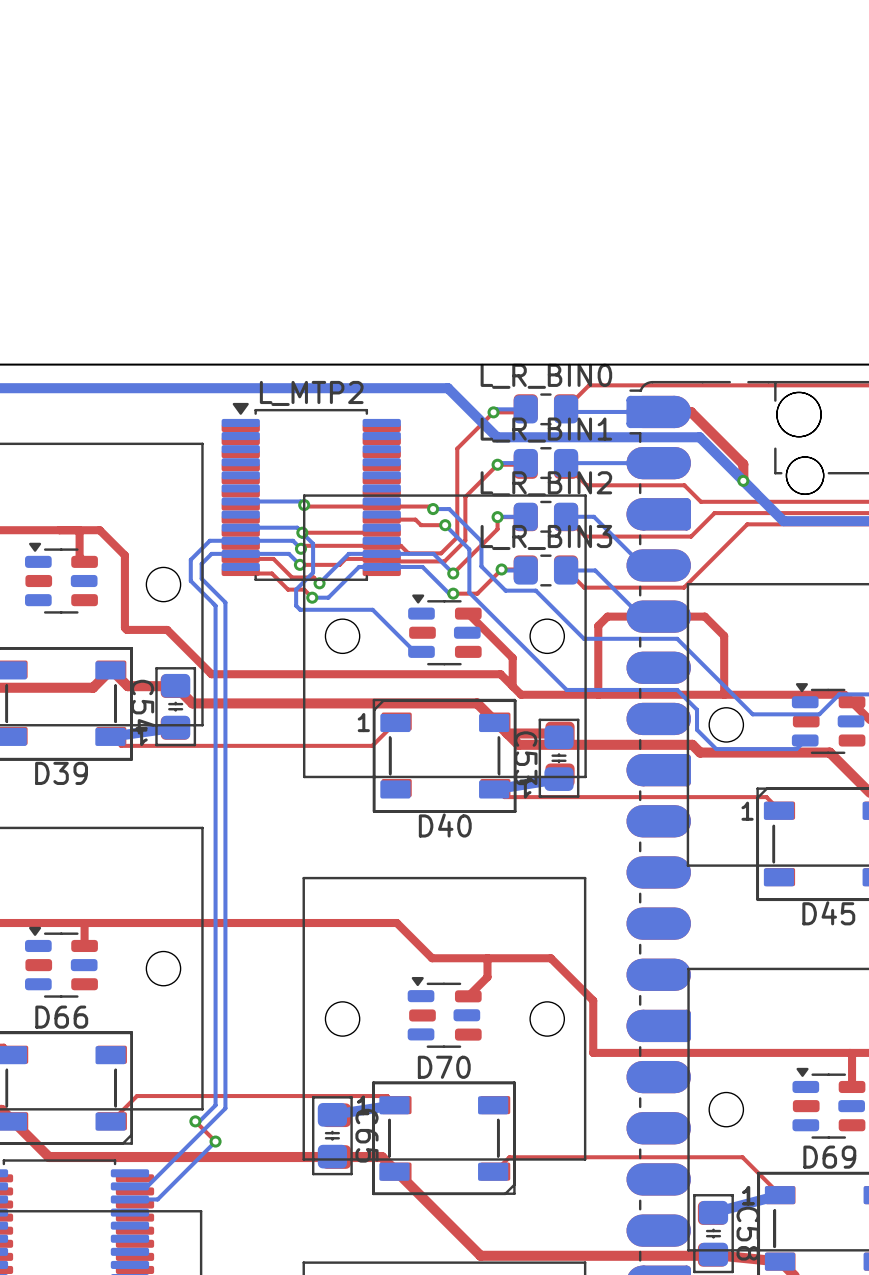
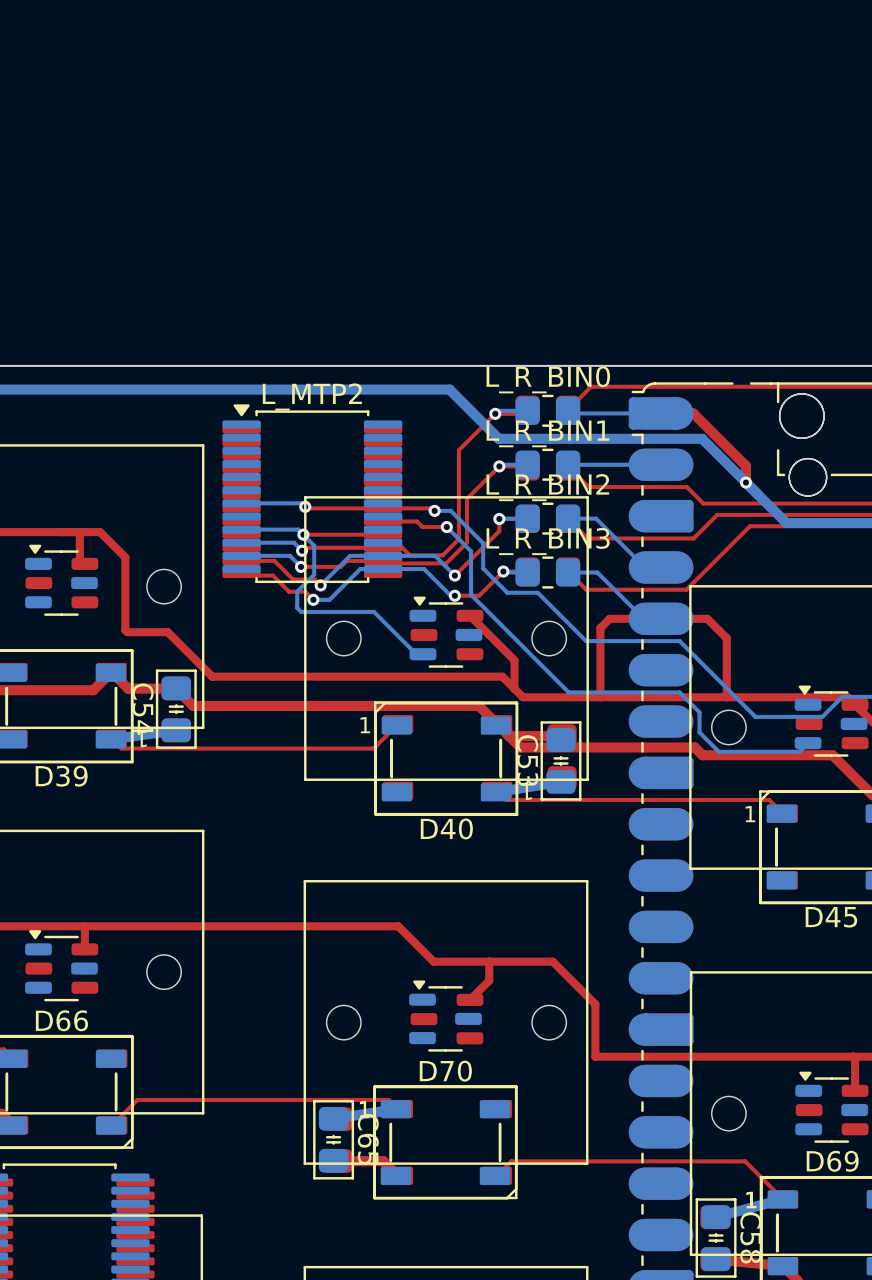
bottom track: (240, 540) (209, 540) (190, 559) (190, 580) (215, 605) (215, 1105) (199, 1121) (195, 1121) -> none
bottom track: (240, 553) (211, 553) (201, 563) (201, 578) (225, 602) (225, 1108) (147, 1186) (129, 1186) -> none
top track: (13, 1121) (48, 1157) (336, 1157) -> none
top track: (195, 1121) (215, 1141) -> none
via: (195, 1121) -> none
bottom track: (215, 1141) (157, 1199) (129, 1199) -> none
via: (215, 1141) -> none
top track: (396, 1171) (480, 1255) (712, 1254) -> none

